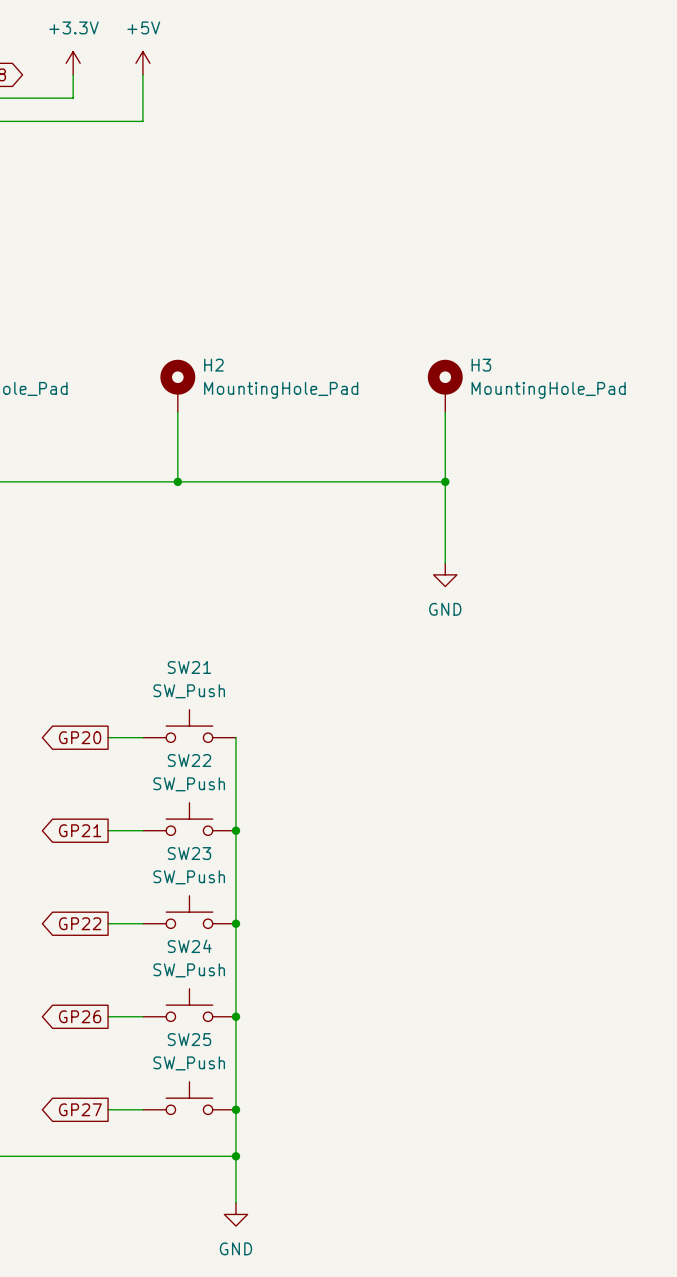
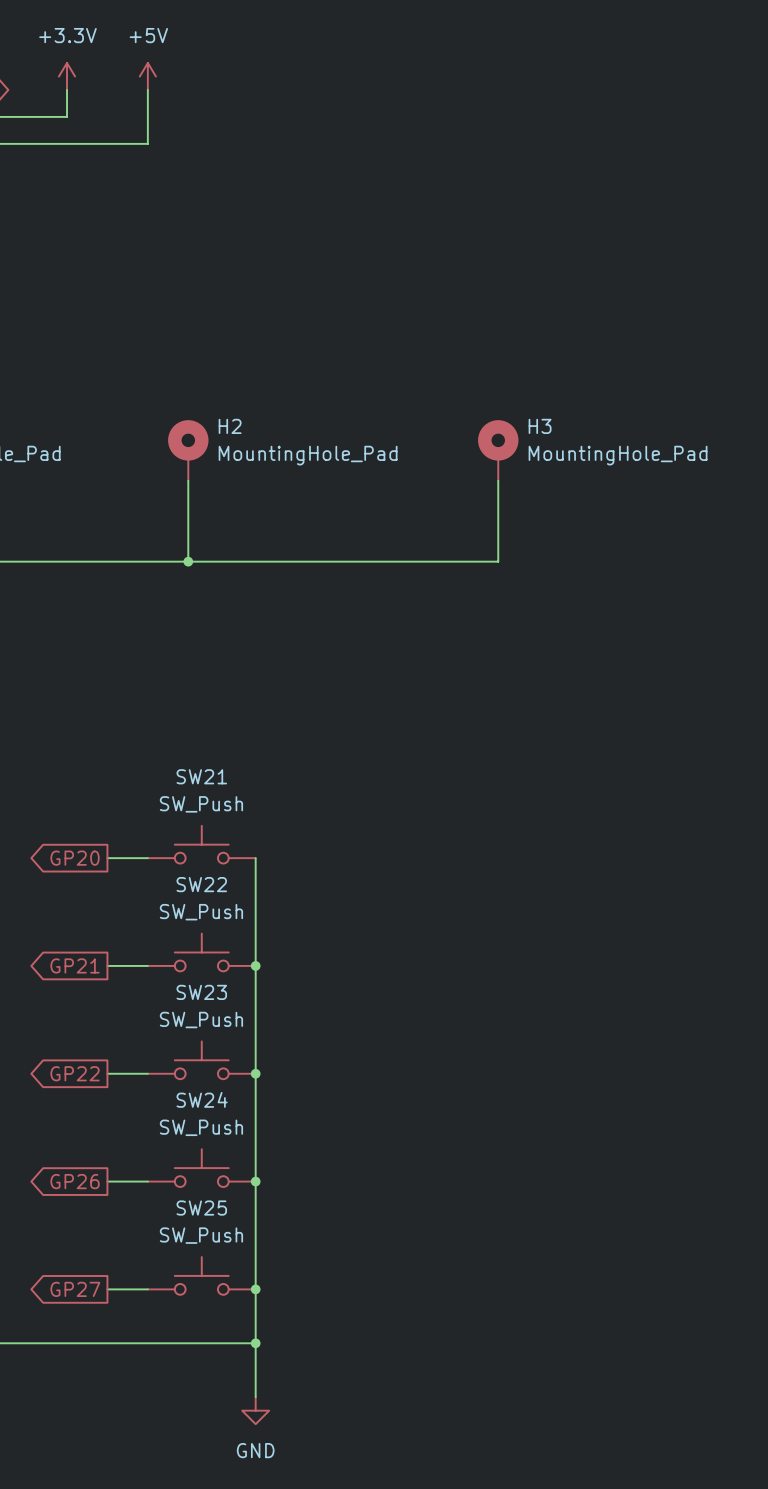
wire: (445, 481) (445, 563) -> none
junction: (445, 481) -> none
power symbol: GND (445, 574) -> none

